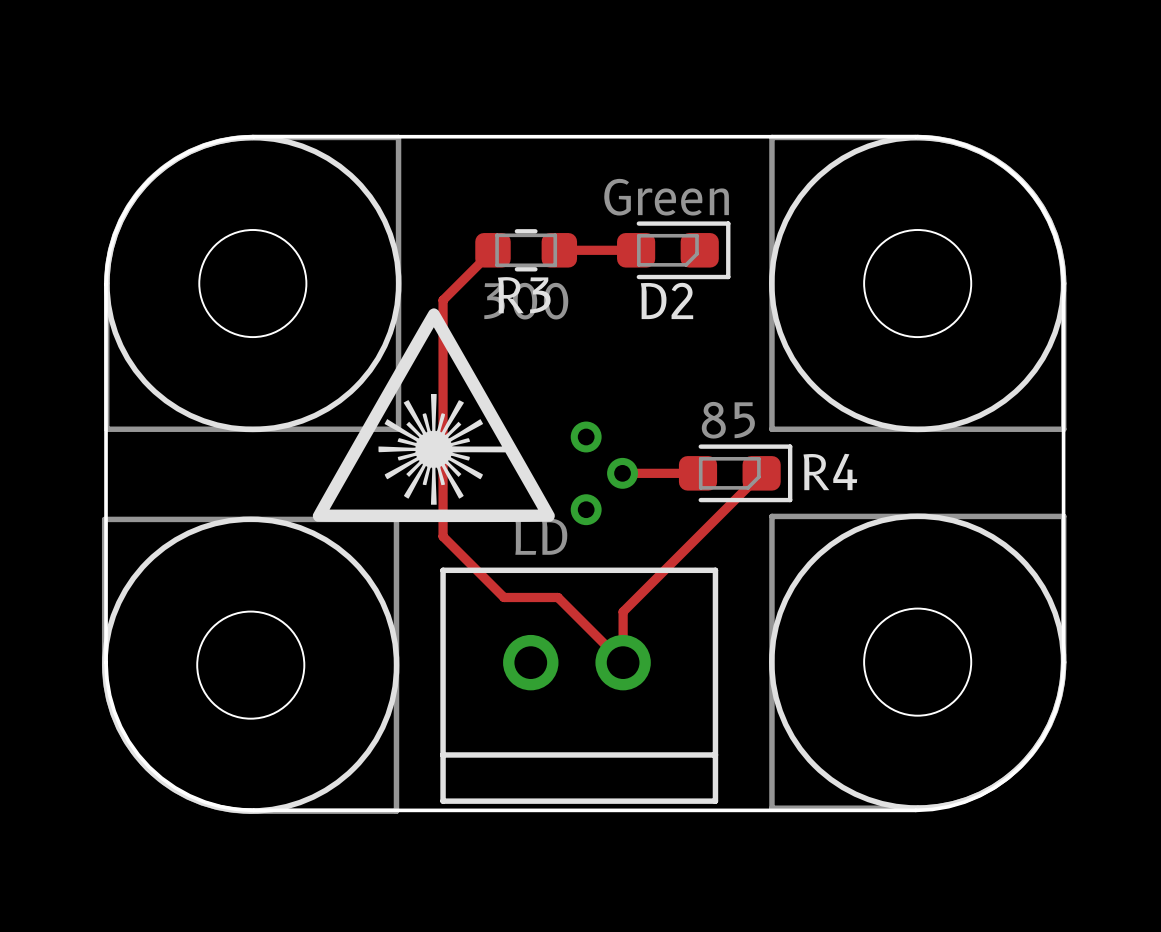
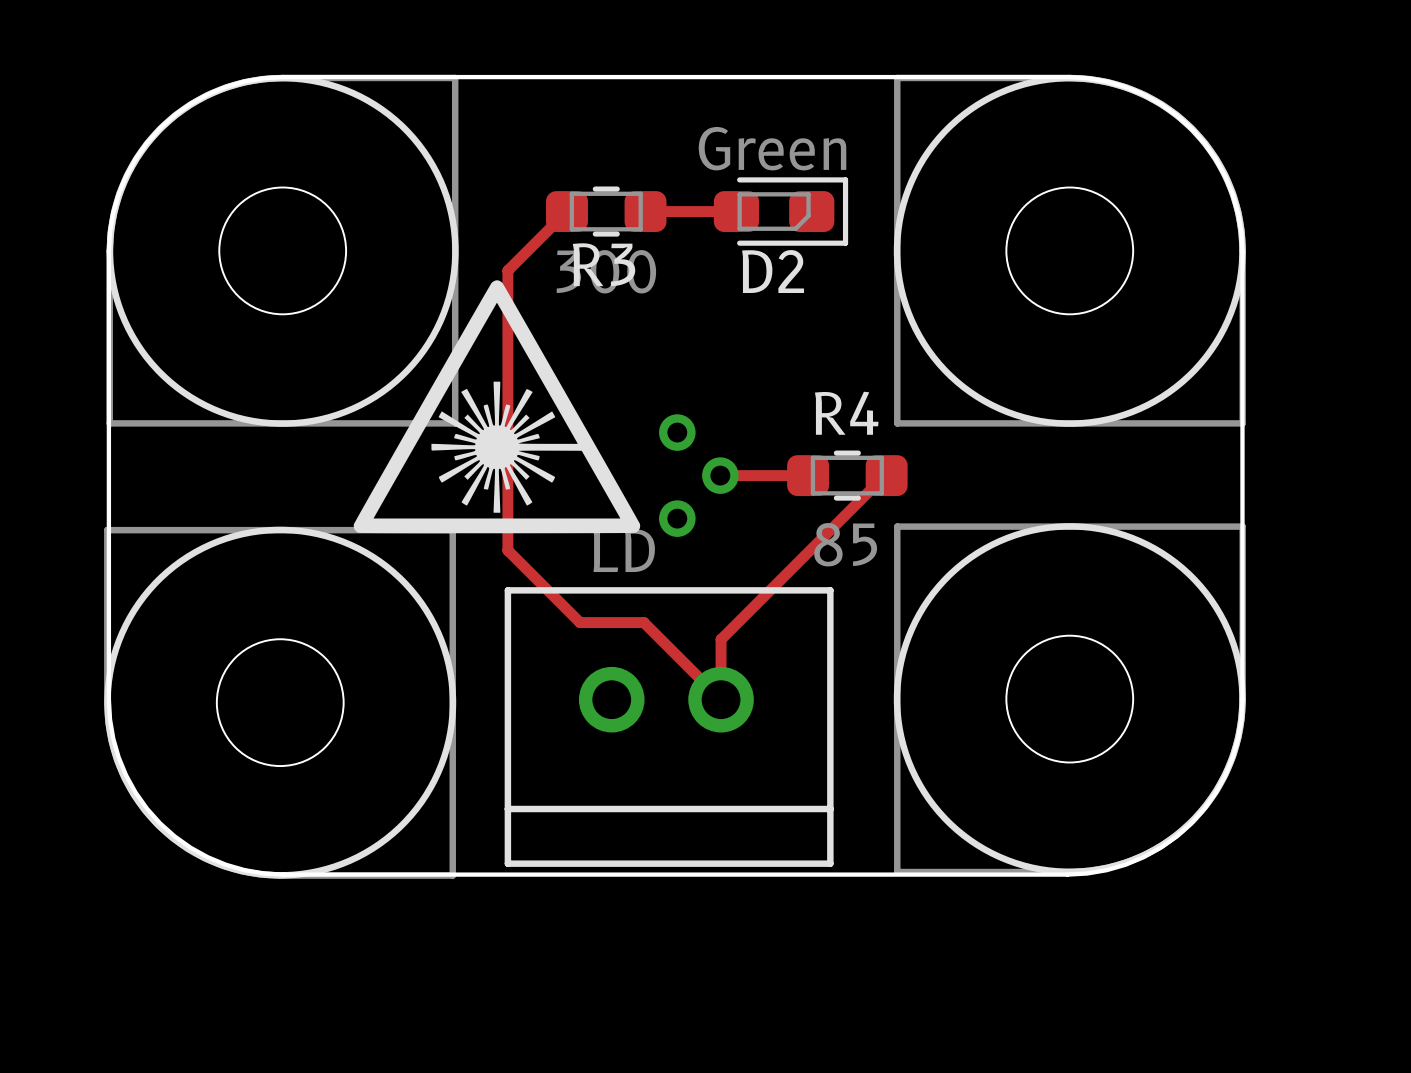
R4 value position: 85 (728, 420) -> 85 (845, 544)
R4 footprint: [678, 444, 793, 503] -> [787, 450, 908, 501]
R4 name position: R4 (830, 471) -> R4 (846, 413)

